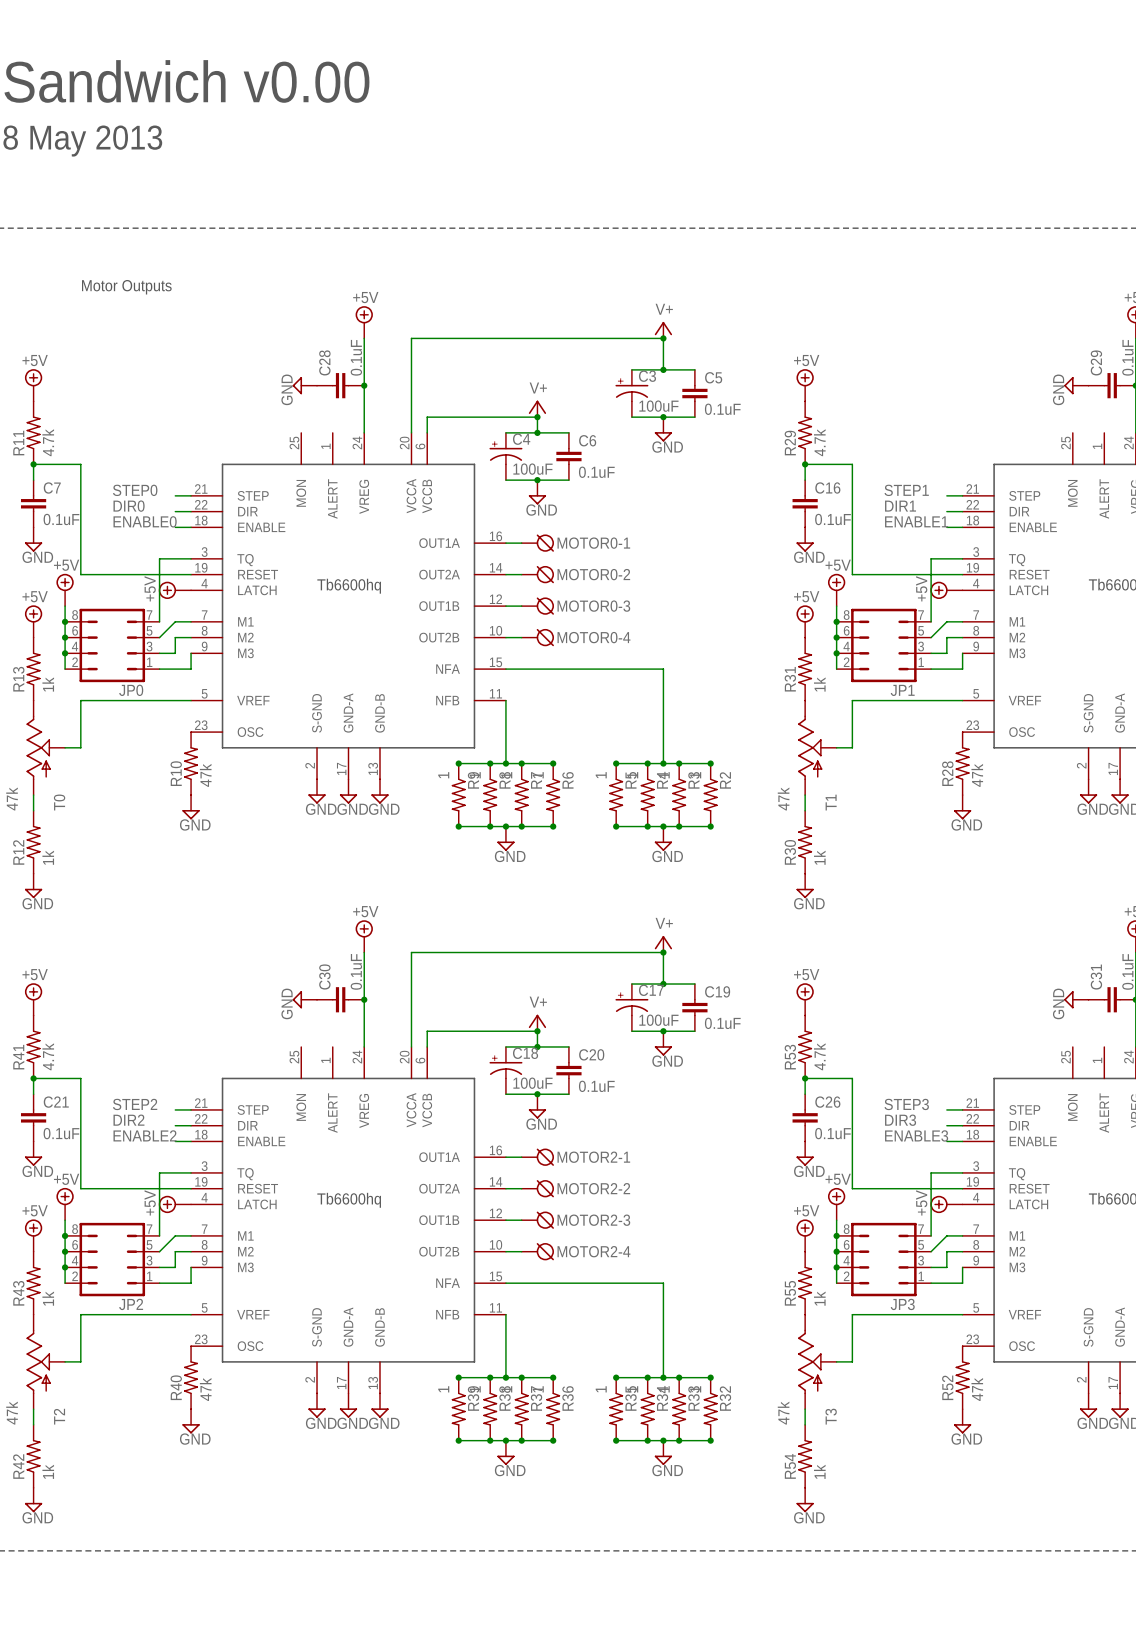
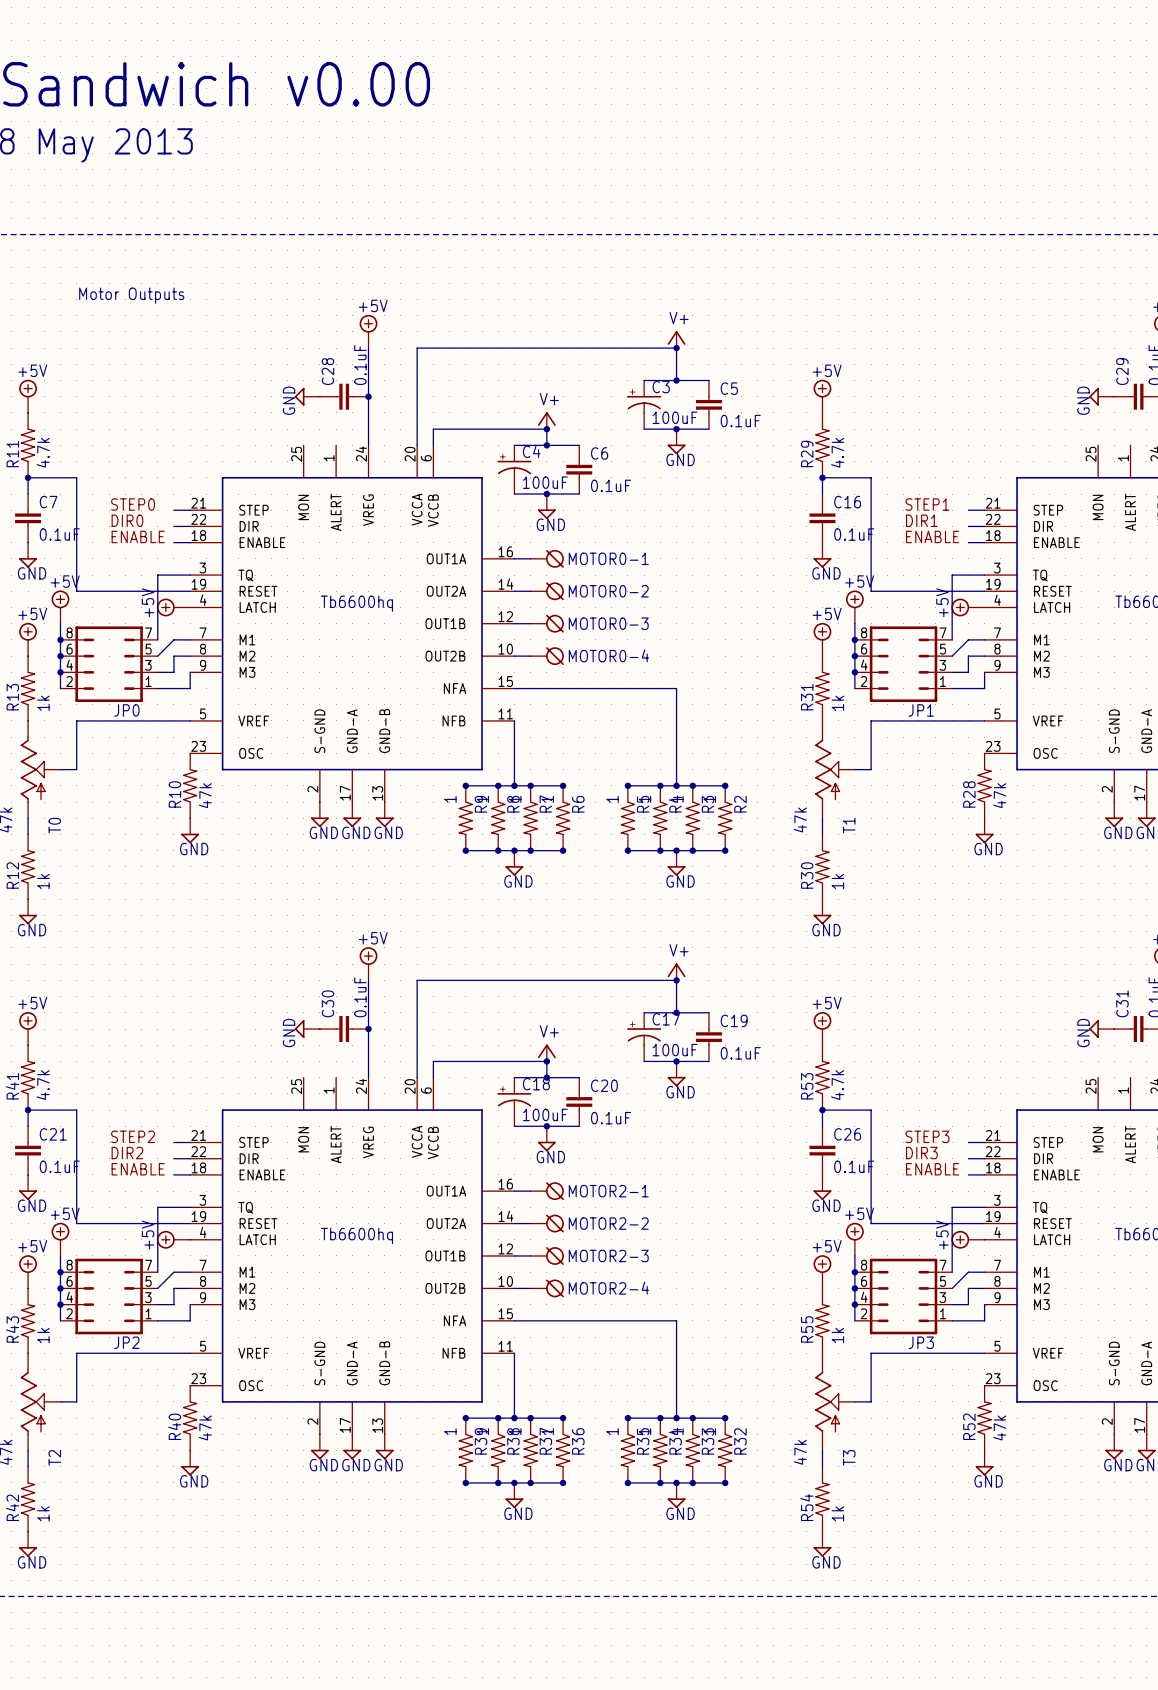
label: ENABLE0 (145, 521) -> ENABLE (138, 536)
label: ENABLE1 (916, 521) -> ENABLE (932, 536)
label: ENABLE2 (145, 1135) -> ENABLE (138, 1169)
label: ENABLE3 (916, 1135) -> ENABLE (932, 1169)

